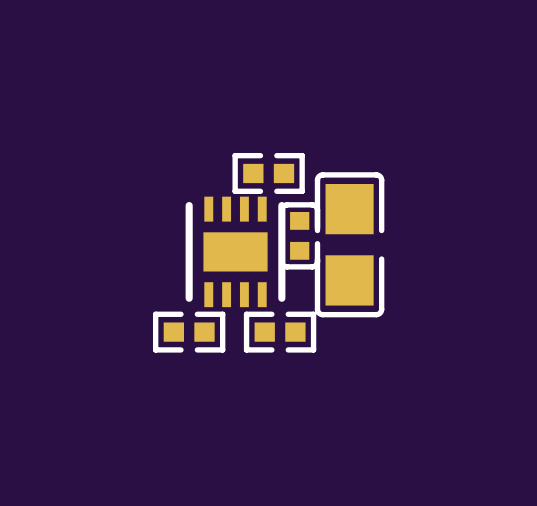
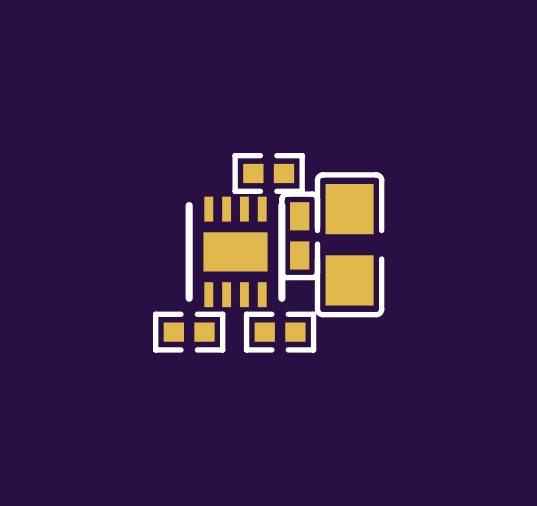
part footprint: [279, 202, 321, 270] -> [279, 191, 321, 281]

